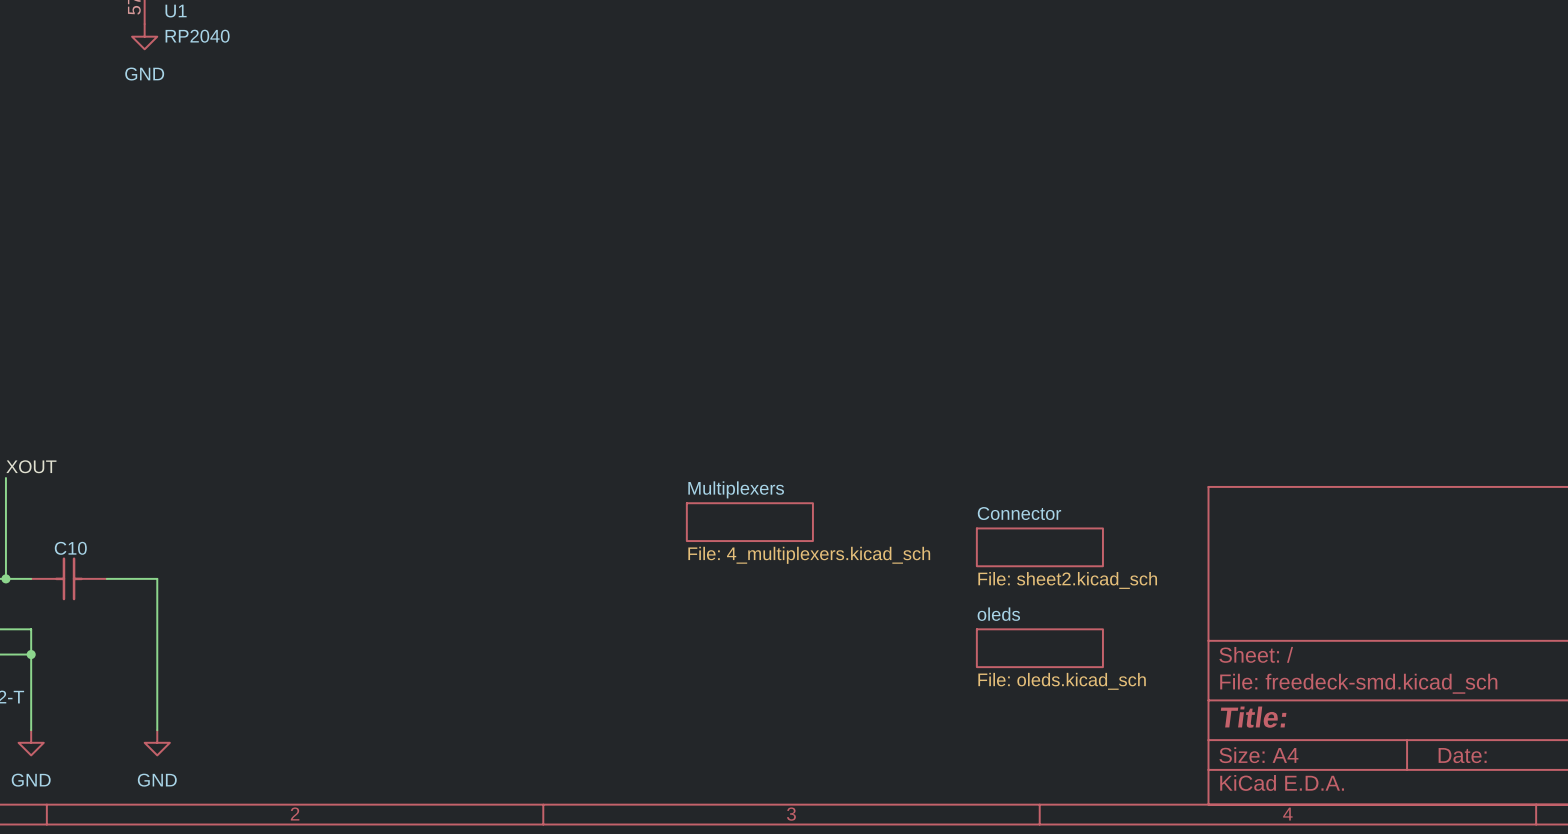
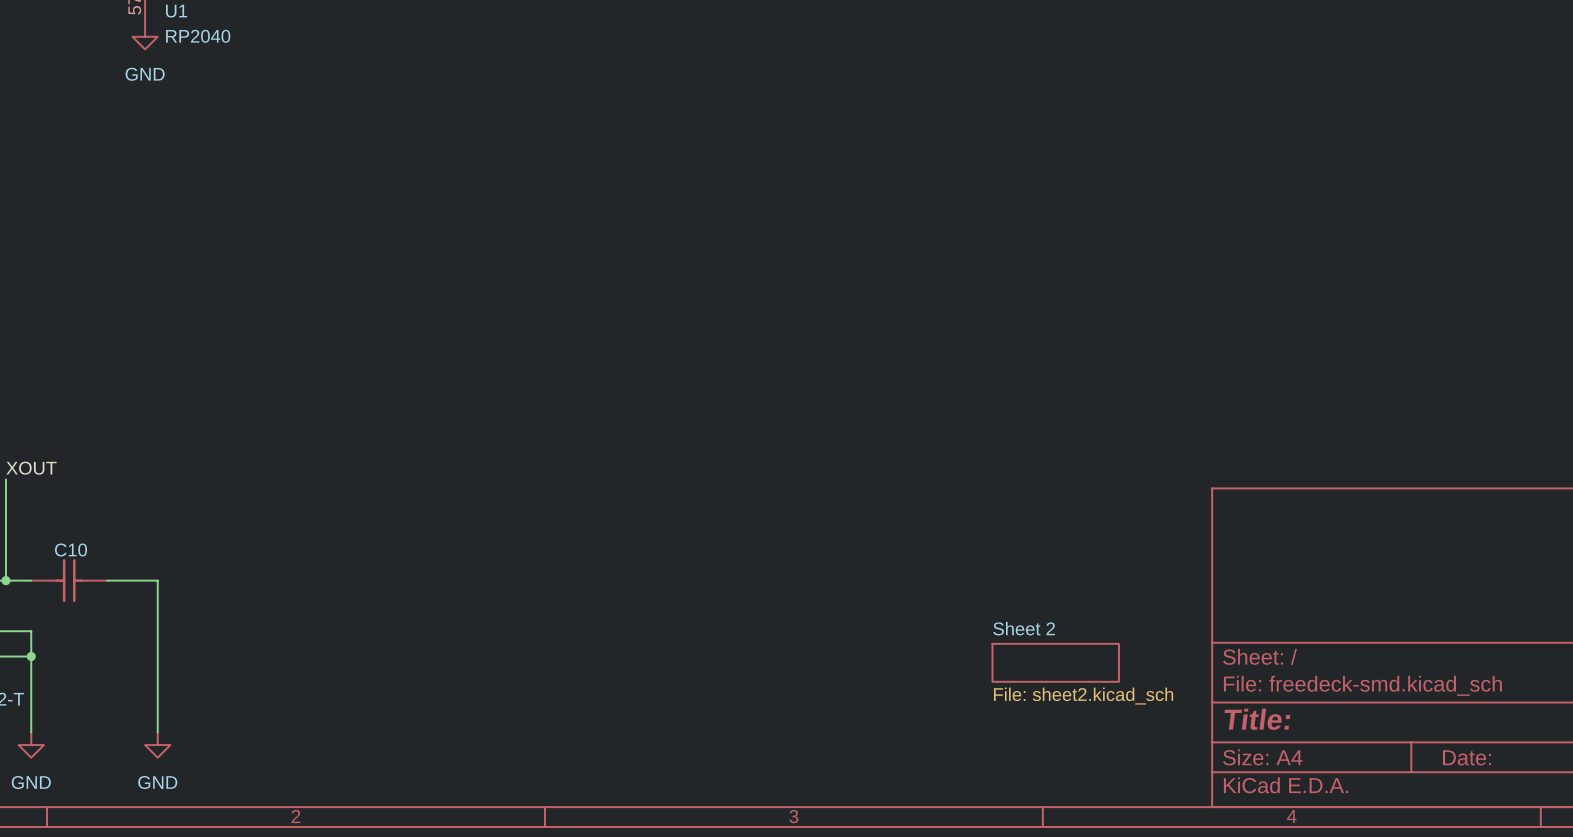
sheet Multiplexers: File: 4_multiplexers.kicad_sch (749, 522) -> none
sheet Connector: File: sheet2.kicad_sch (1039, 547) -> none
sheet oleds: File: oleds.kicad_sch (1039, 648) -> none
sheet Sheet 2: none -> File: sheet2.kicad_sch (1055, 662)

